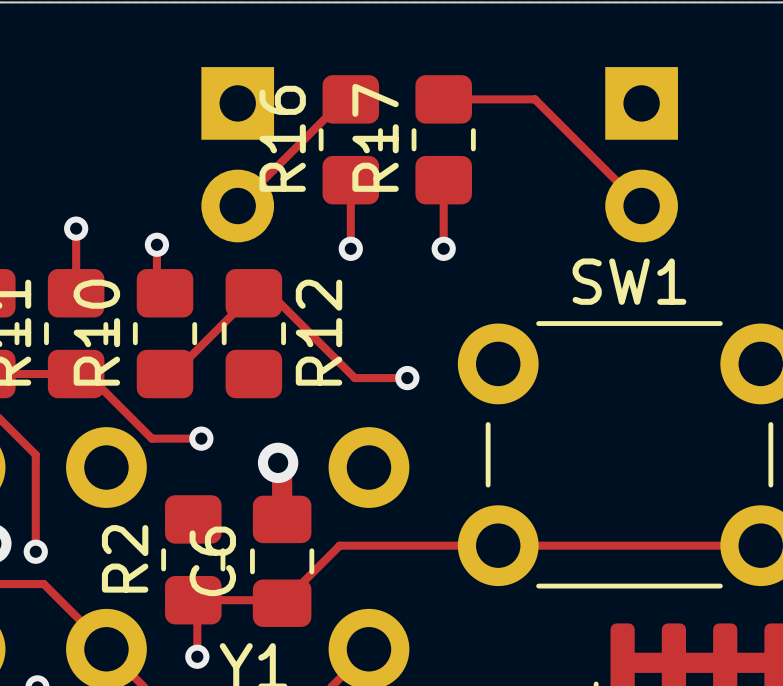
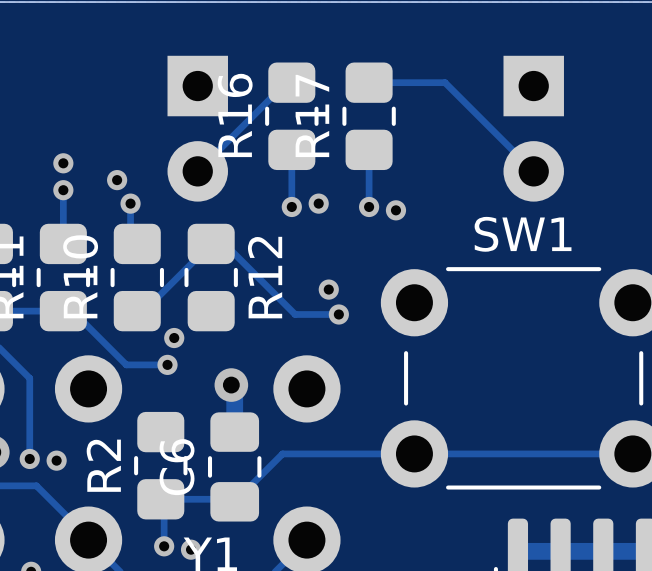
via: none -> (63, 163)
via: none -> (117, 180)
via: none -> (318, 203)
via: none -> (395, 210)
via: none -> (328, 289)
via: none -> (174, 338)
via: none -> (56, 460)
via: none -> (191, 549)

